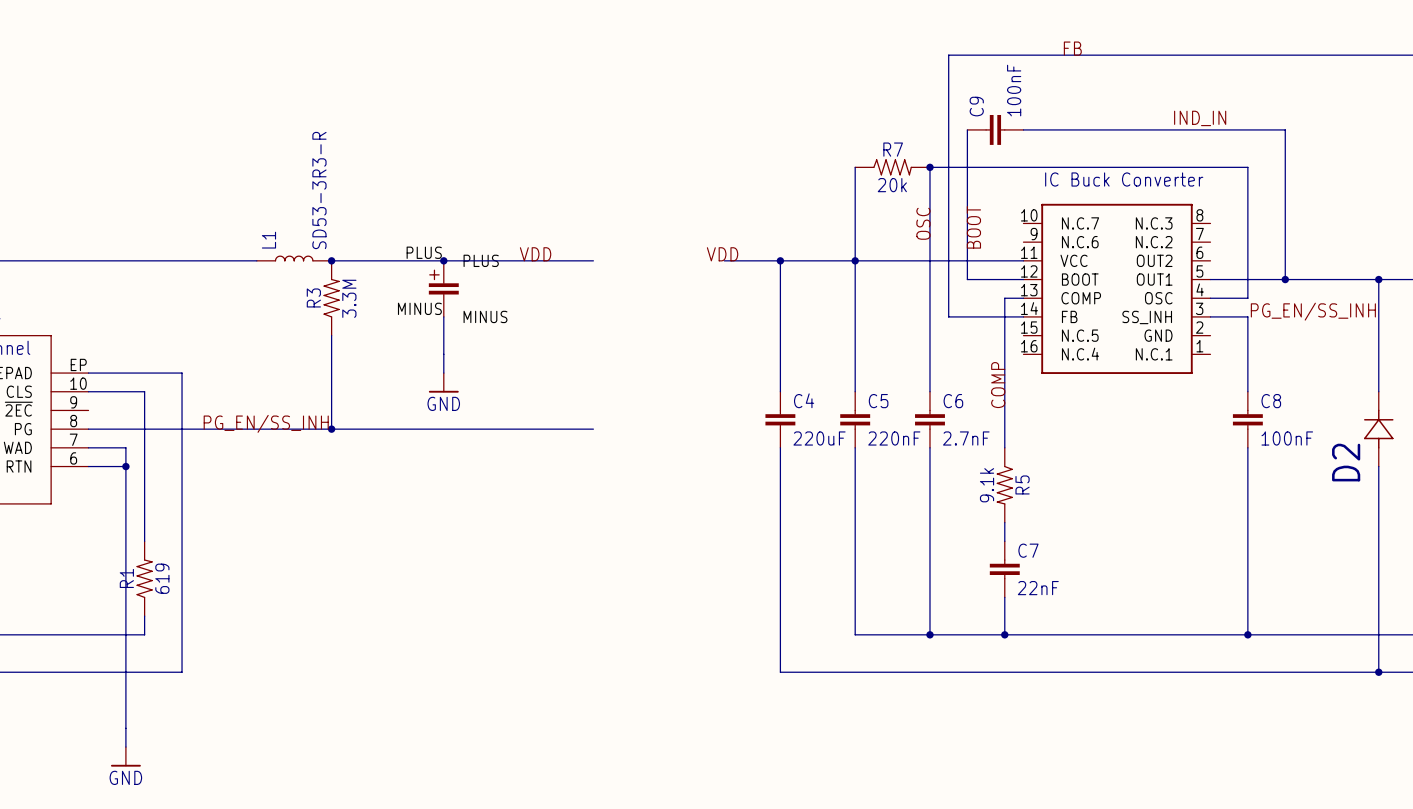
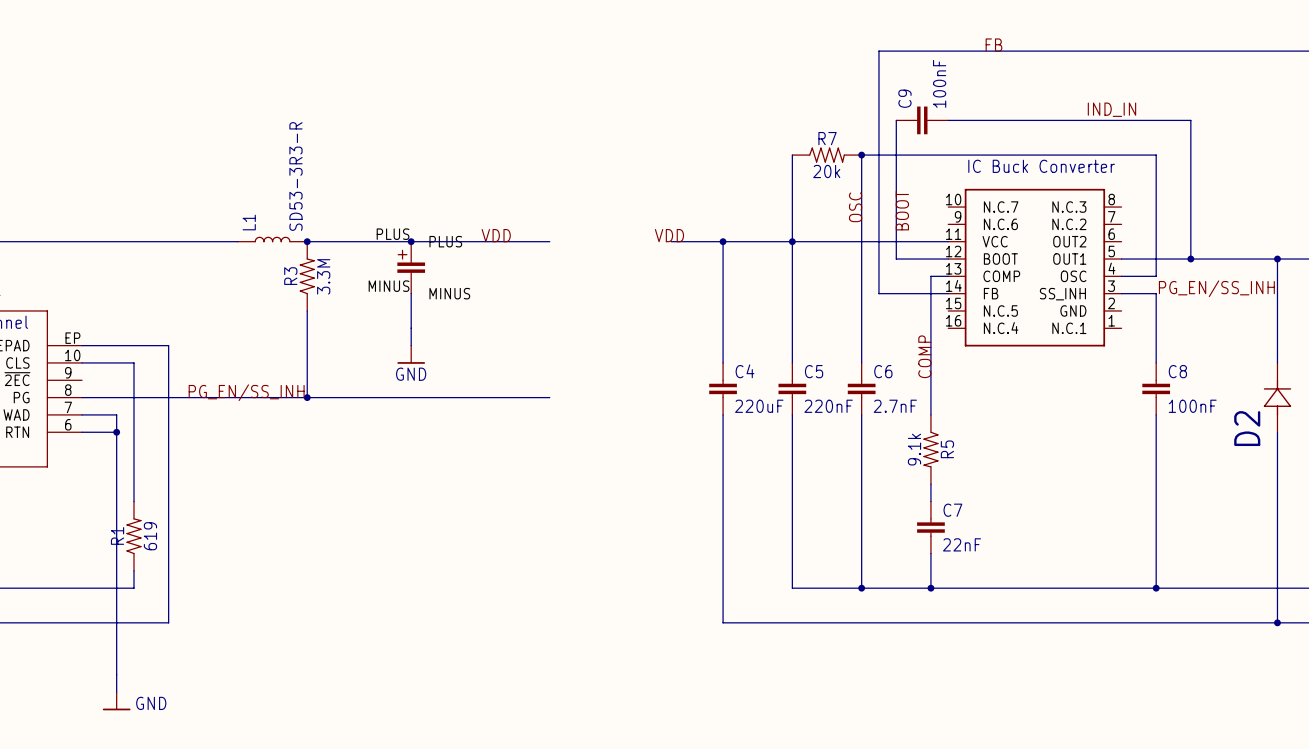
power symbol text position: GND (125, 777) -> GND (151, 703)

